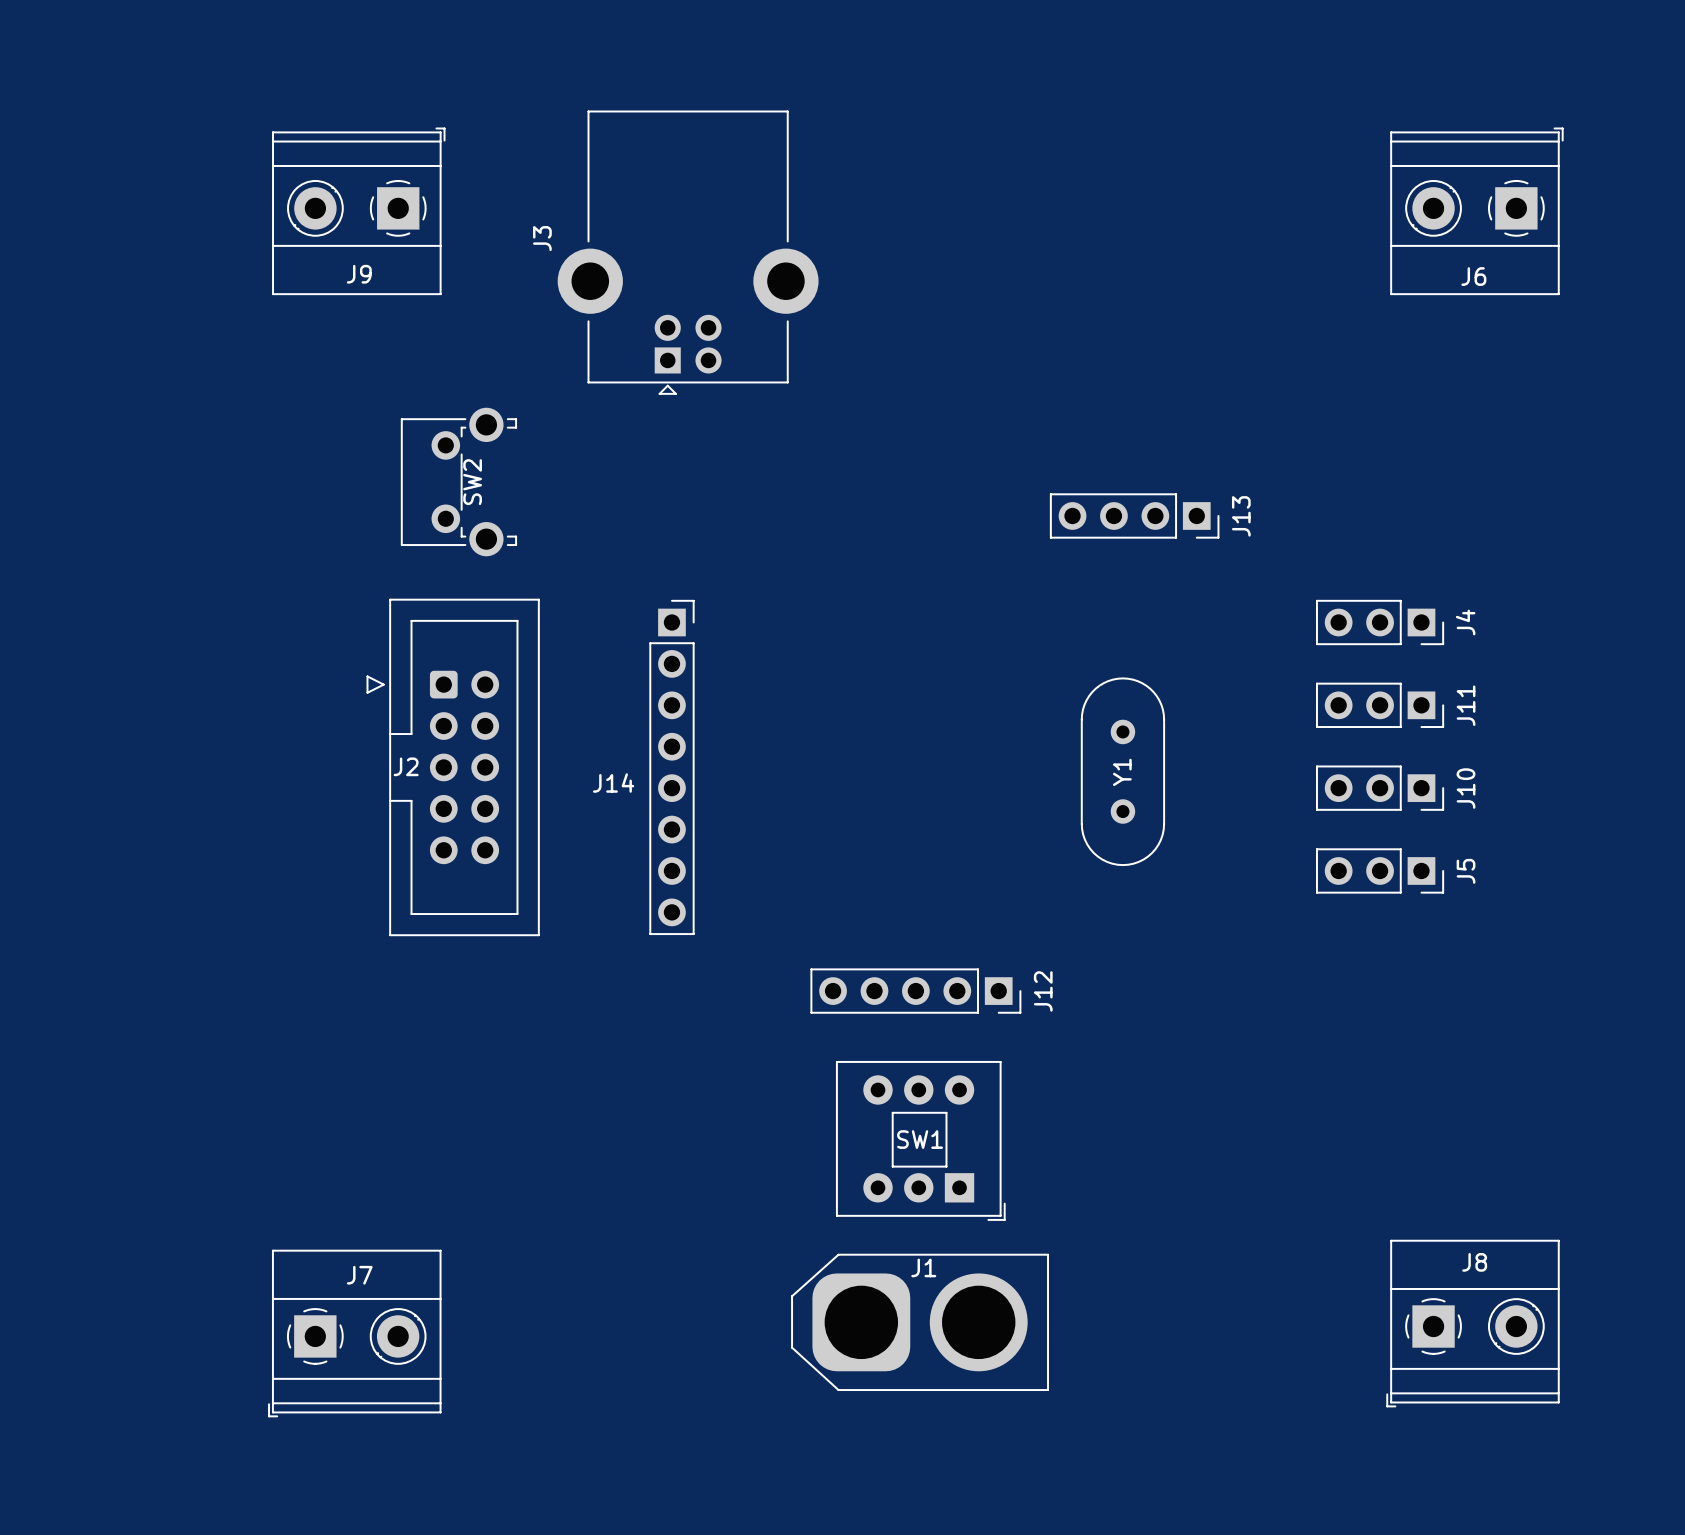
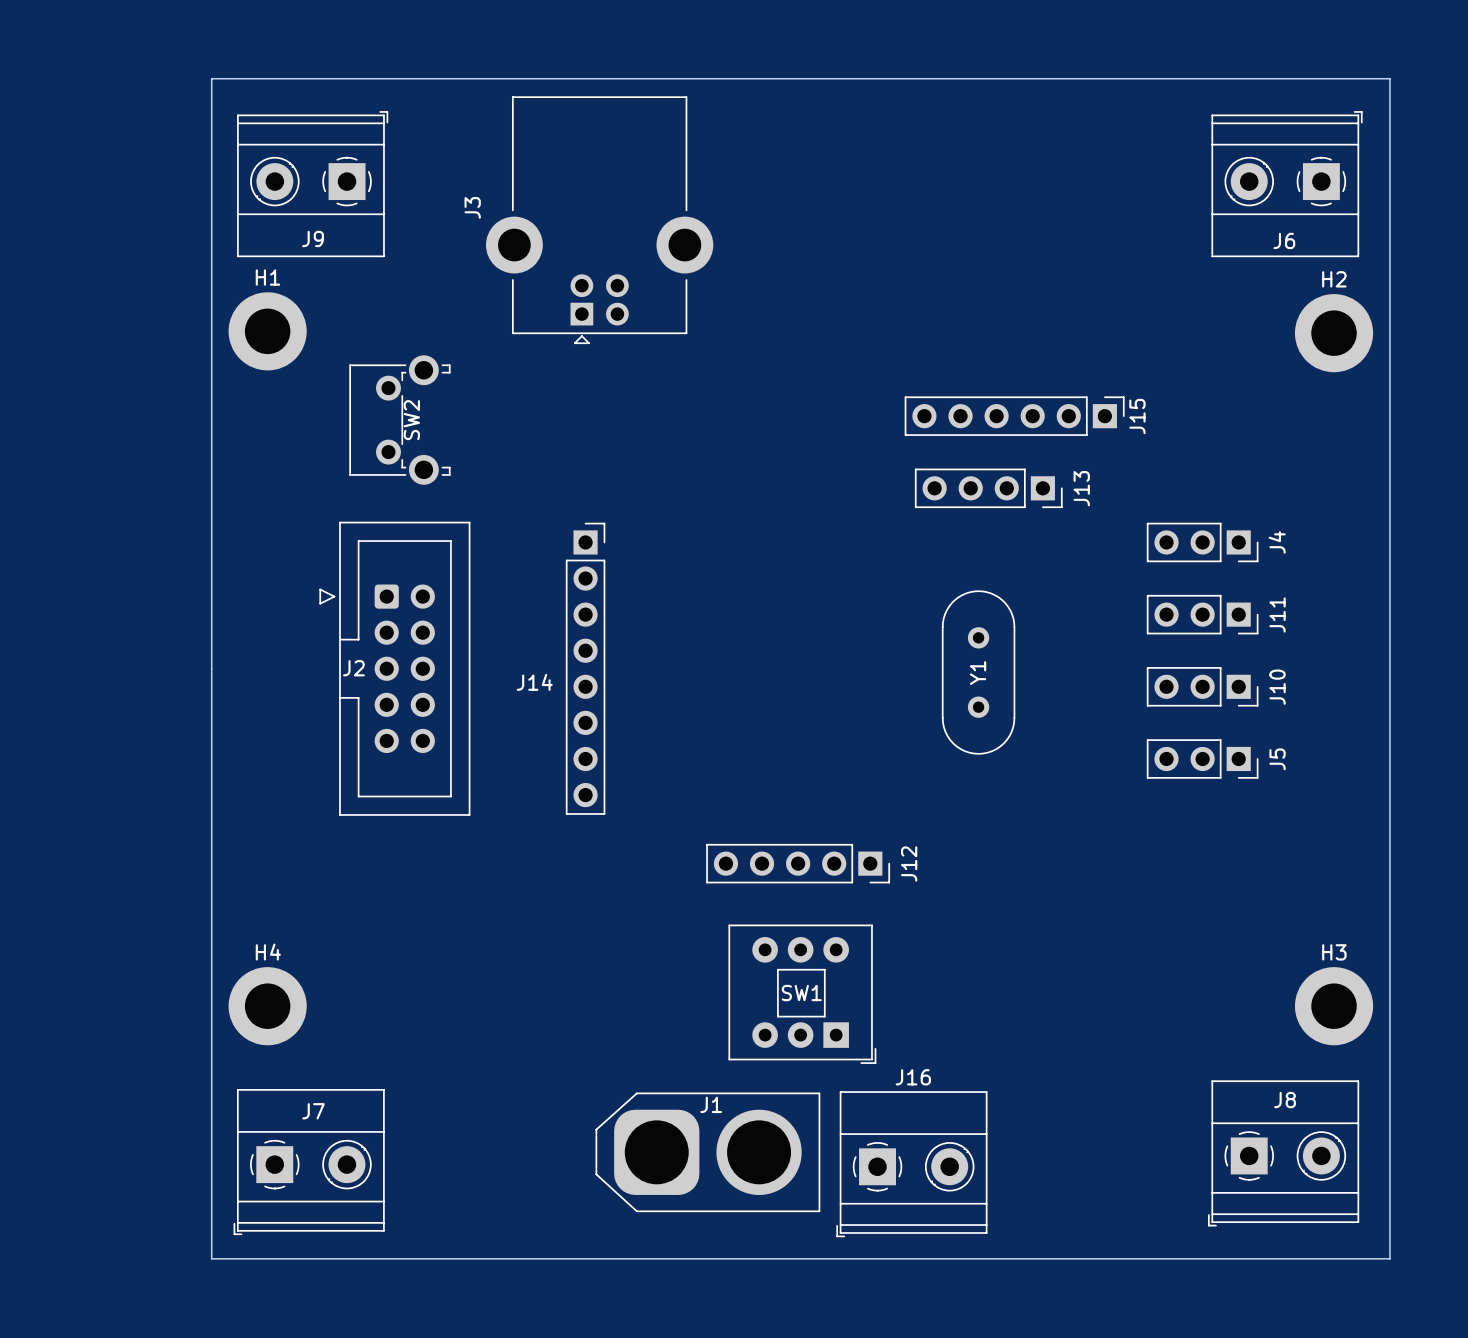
board edge: none -> (211, 78) (211, 1258) (1389, 1258) (1389, 78) (211, 78)
H1: none -> (267, 331)
H2: none -> (1334, 333)
J15: none -> (1014, 416)
J13 position: (1134, 515) -> (988, 488)
H4: none -> (267, 1006)
H3: none -> (1334, 1006)
J1 position: (920, 1322) -> (707, 1152)
J16: none -> (911, 1164)

